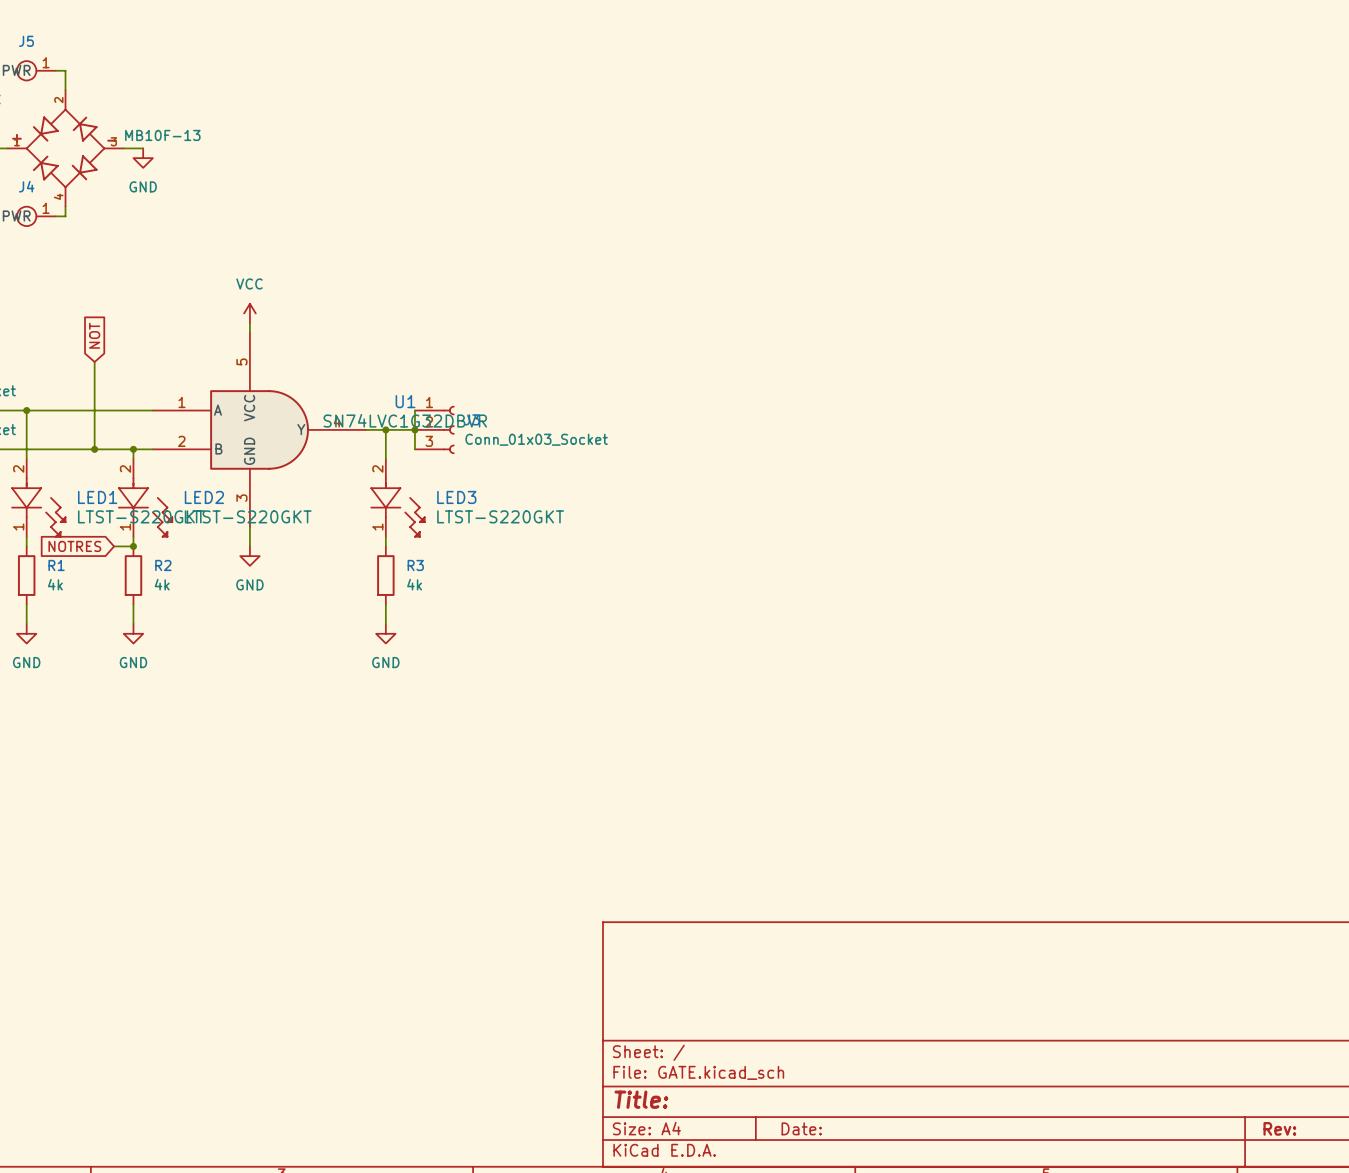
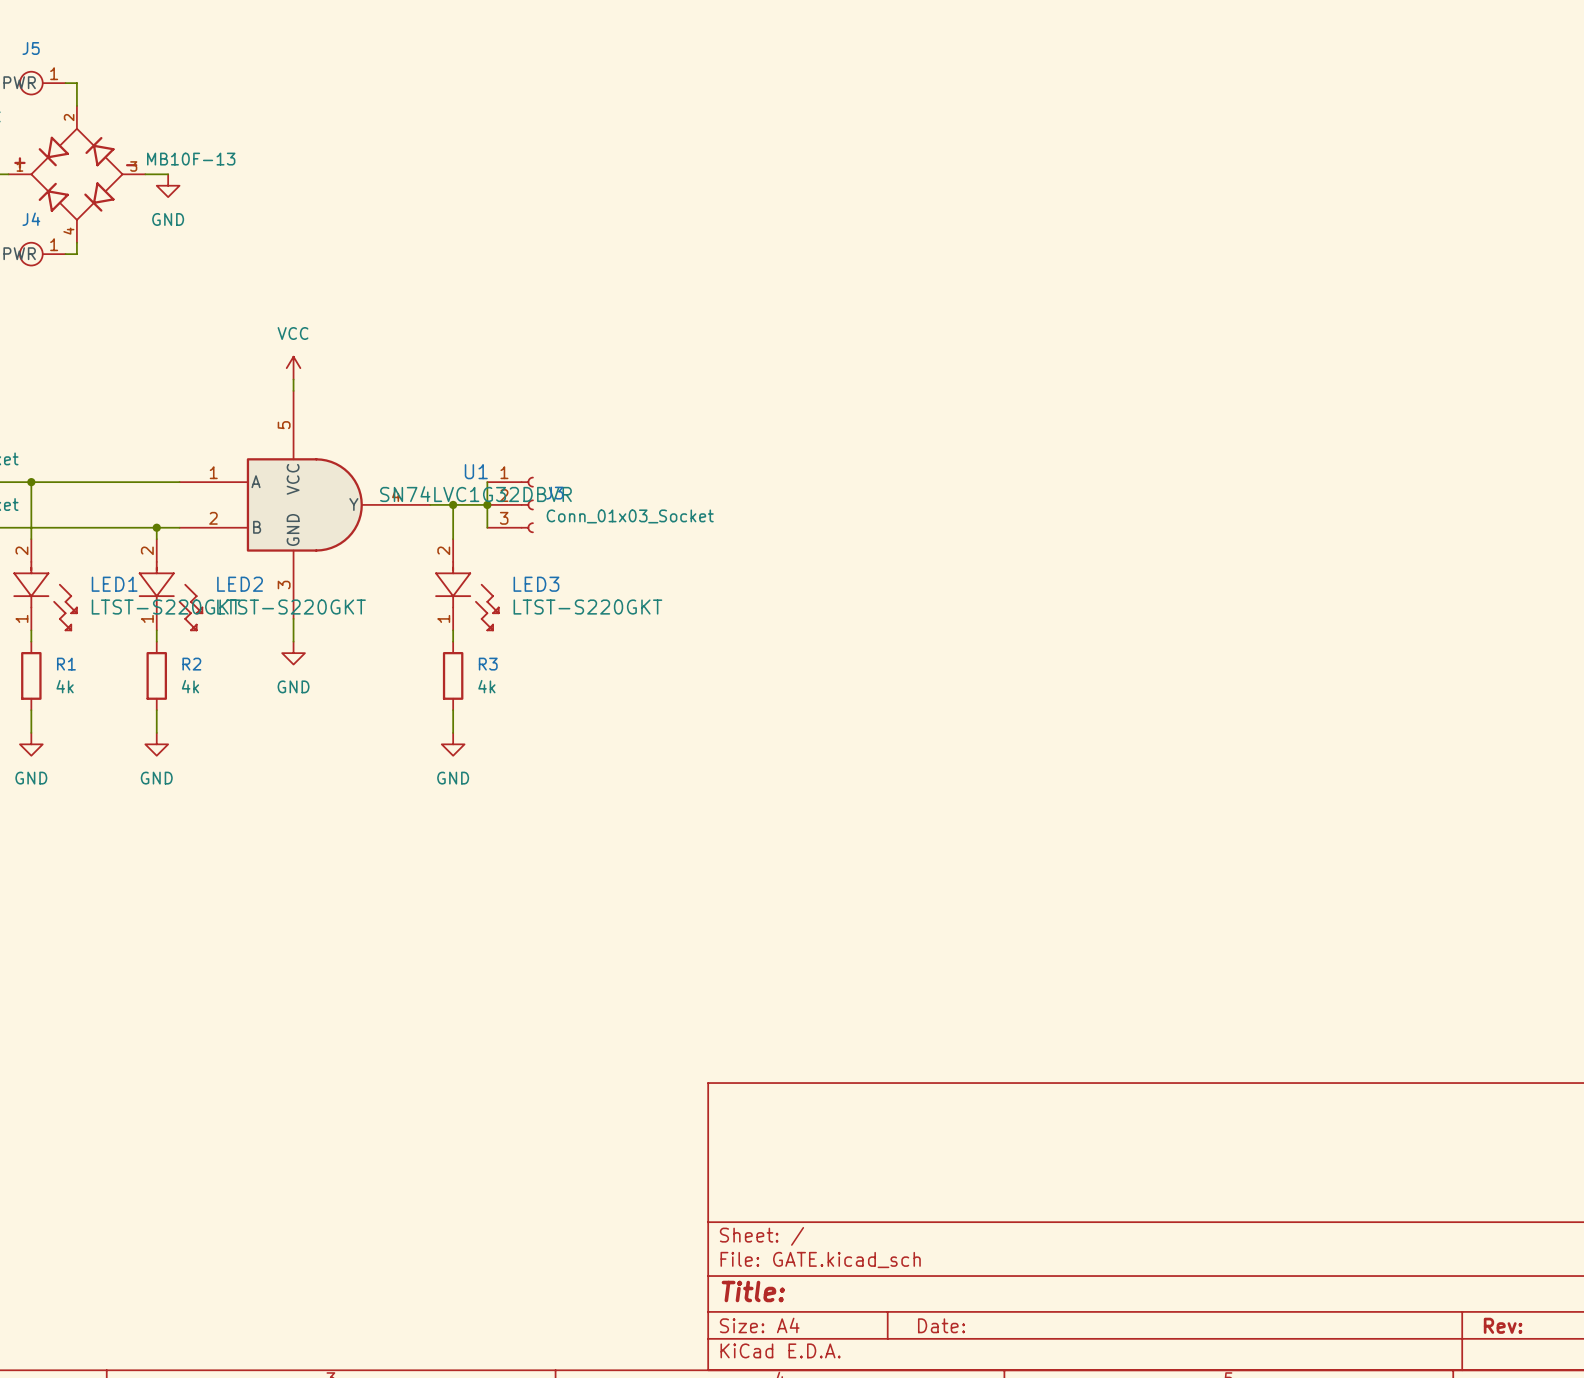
global label: NOT (94, 335) -> none
wire: (94, 361) (94, 449) -> none
junction: (94, 449) -> none
global label: NOTRES (74, 546) -> none
wire: (114, 546) (133, 546) -> none
junction: (133, 546) -> none

